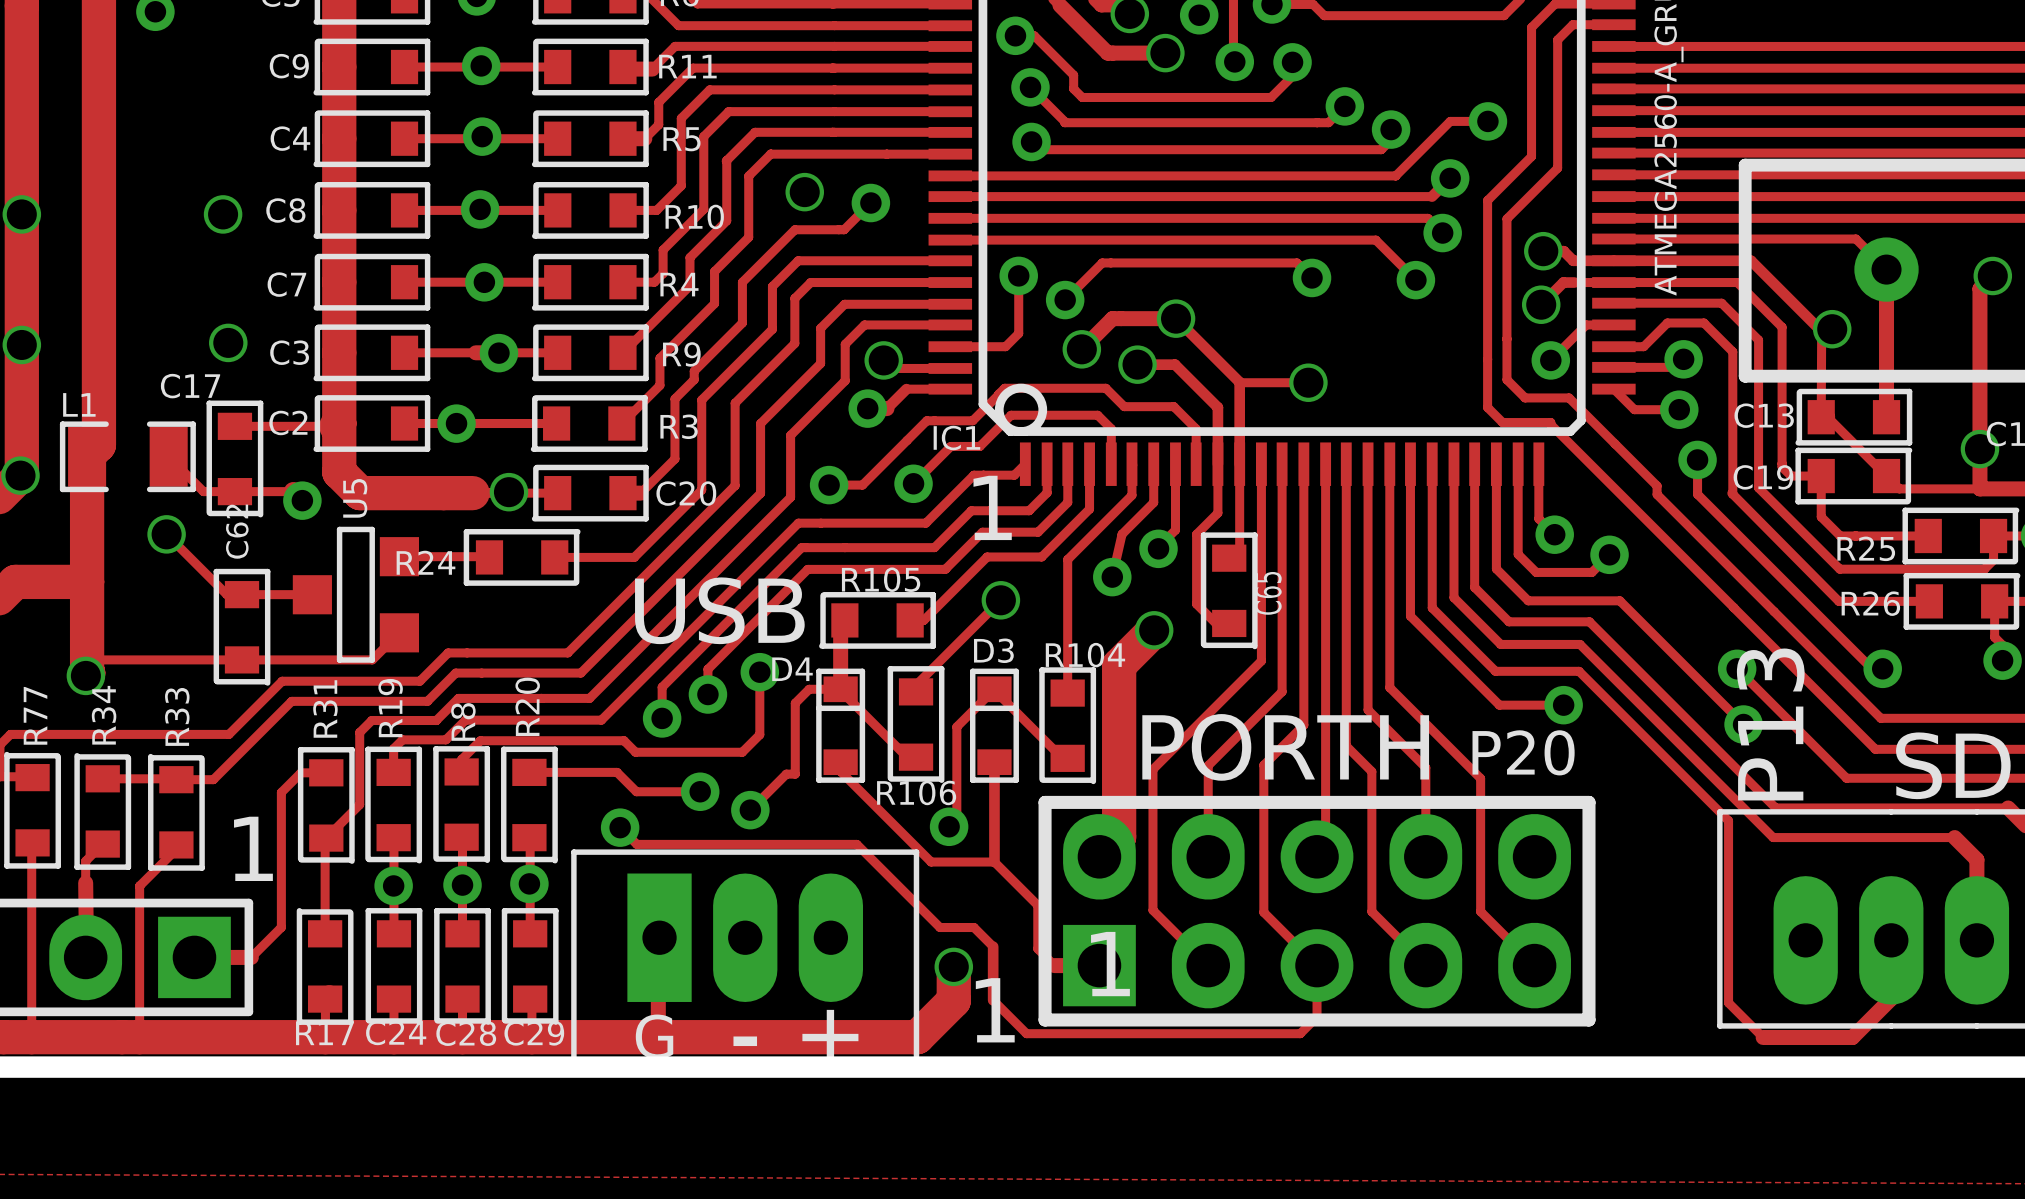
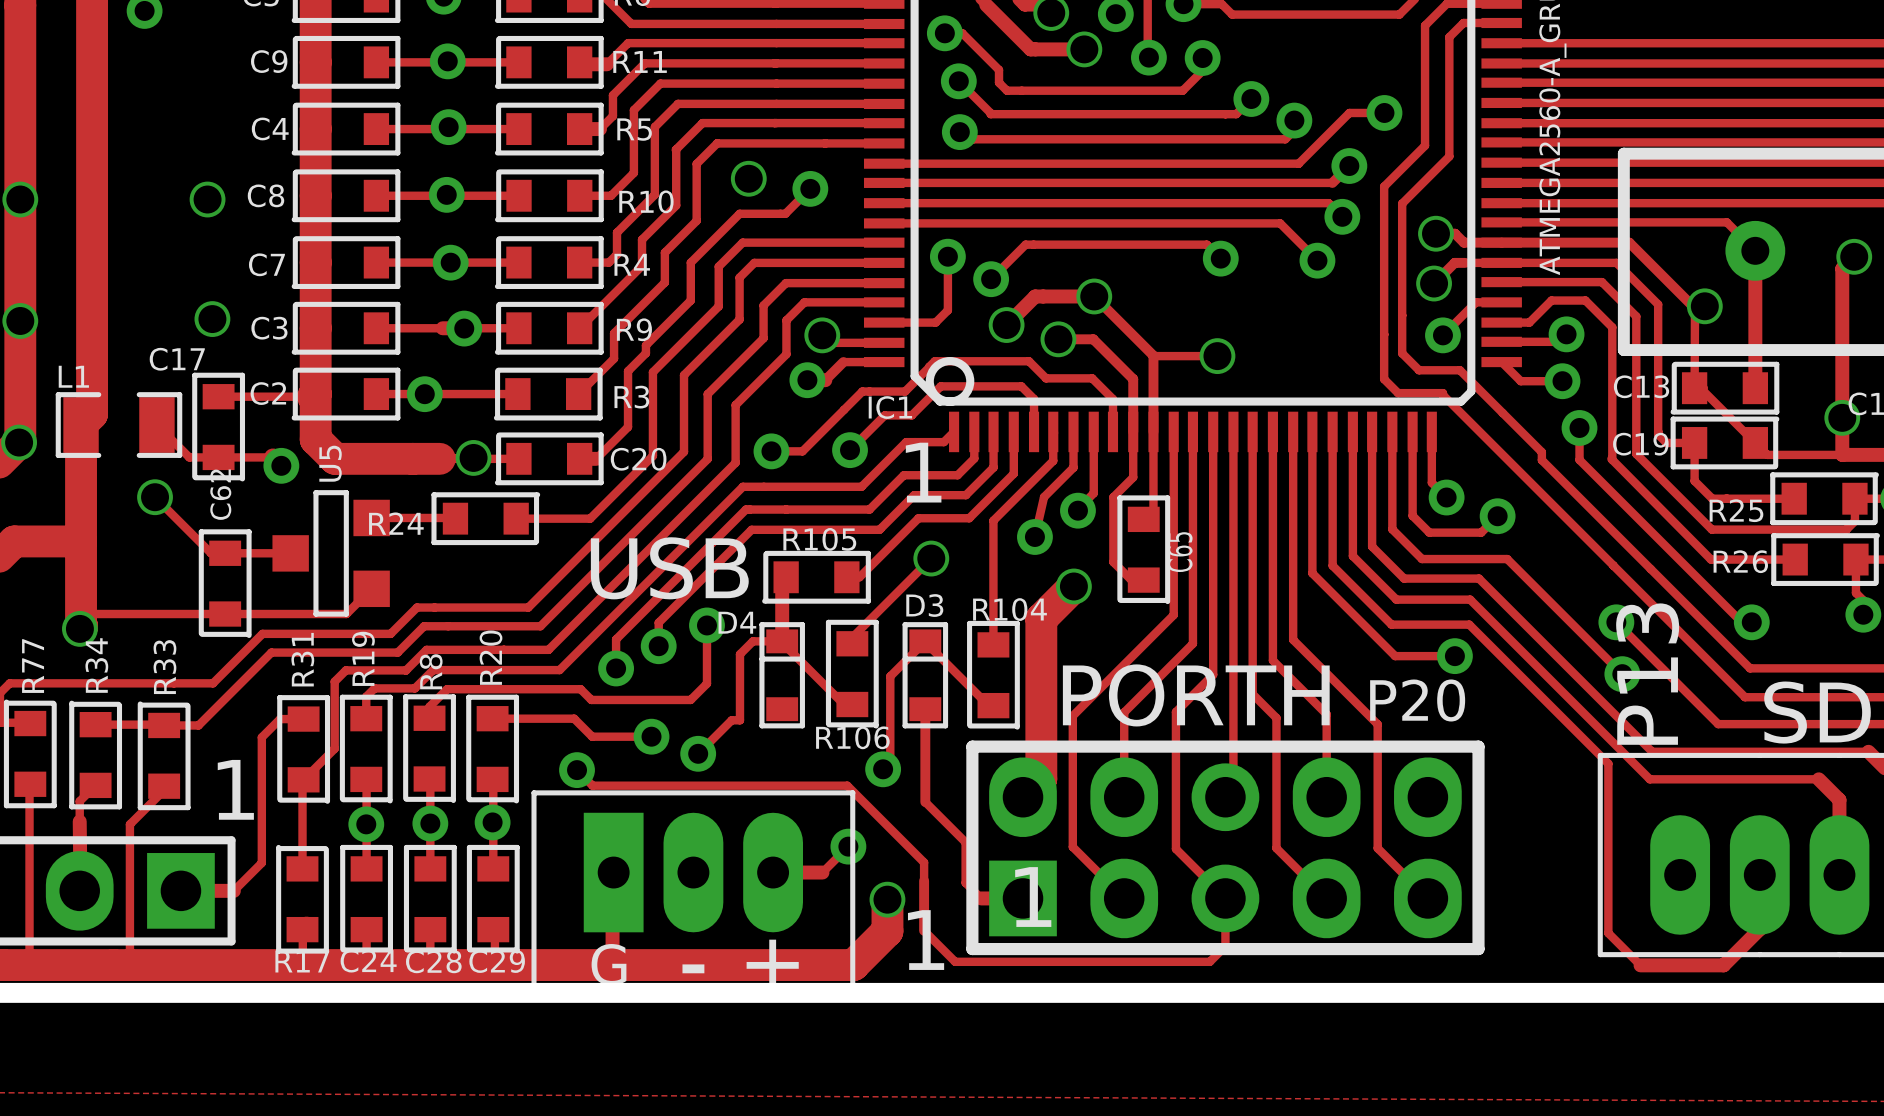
track: (840, 762) (840, 771) (931, 862) (994, 862) -> none
track: (856, 844) (939, 927) (974, 927) (993, 946) -> (797, 785) (847, 785) (924, 862) (924, 880)
track: none -> (848, 846) (822, 872) (773, 872)
via: none -> (848, 846)

